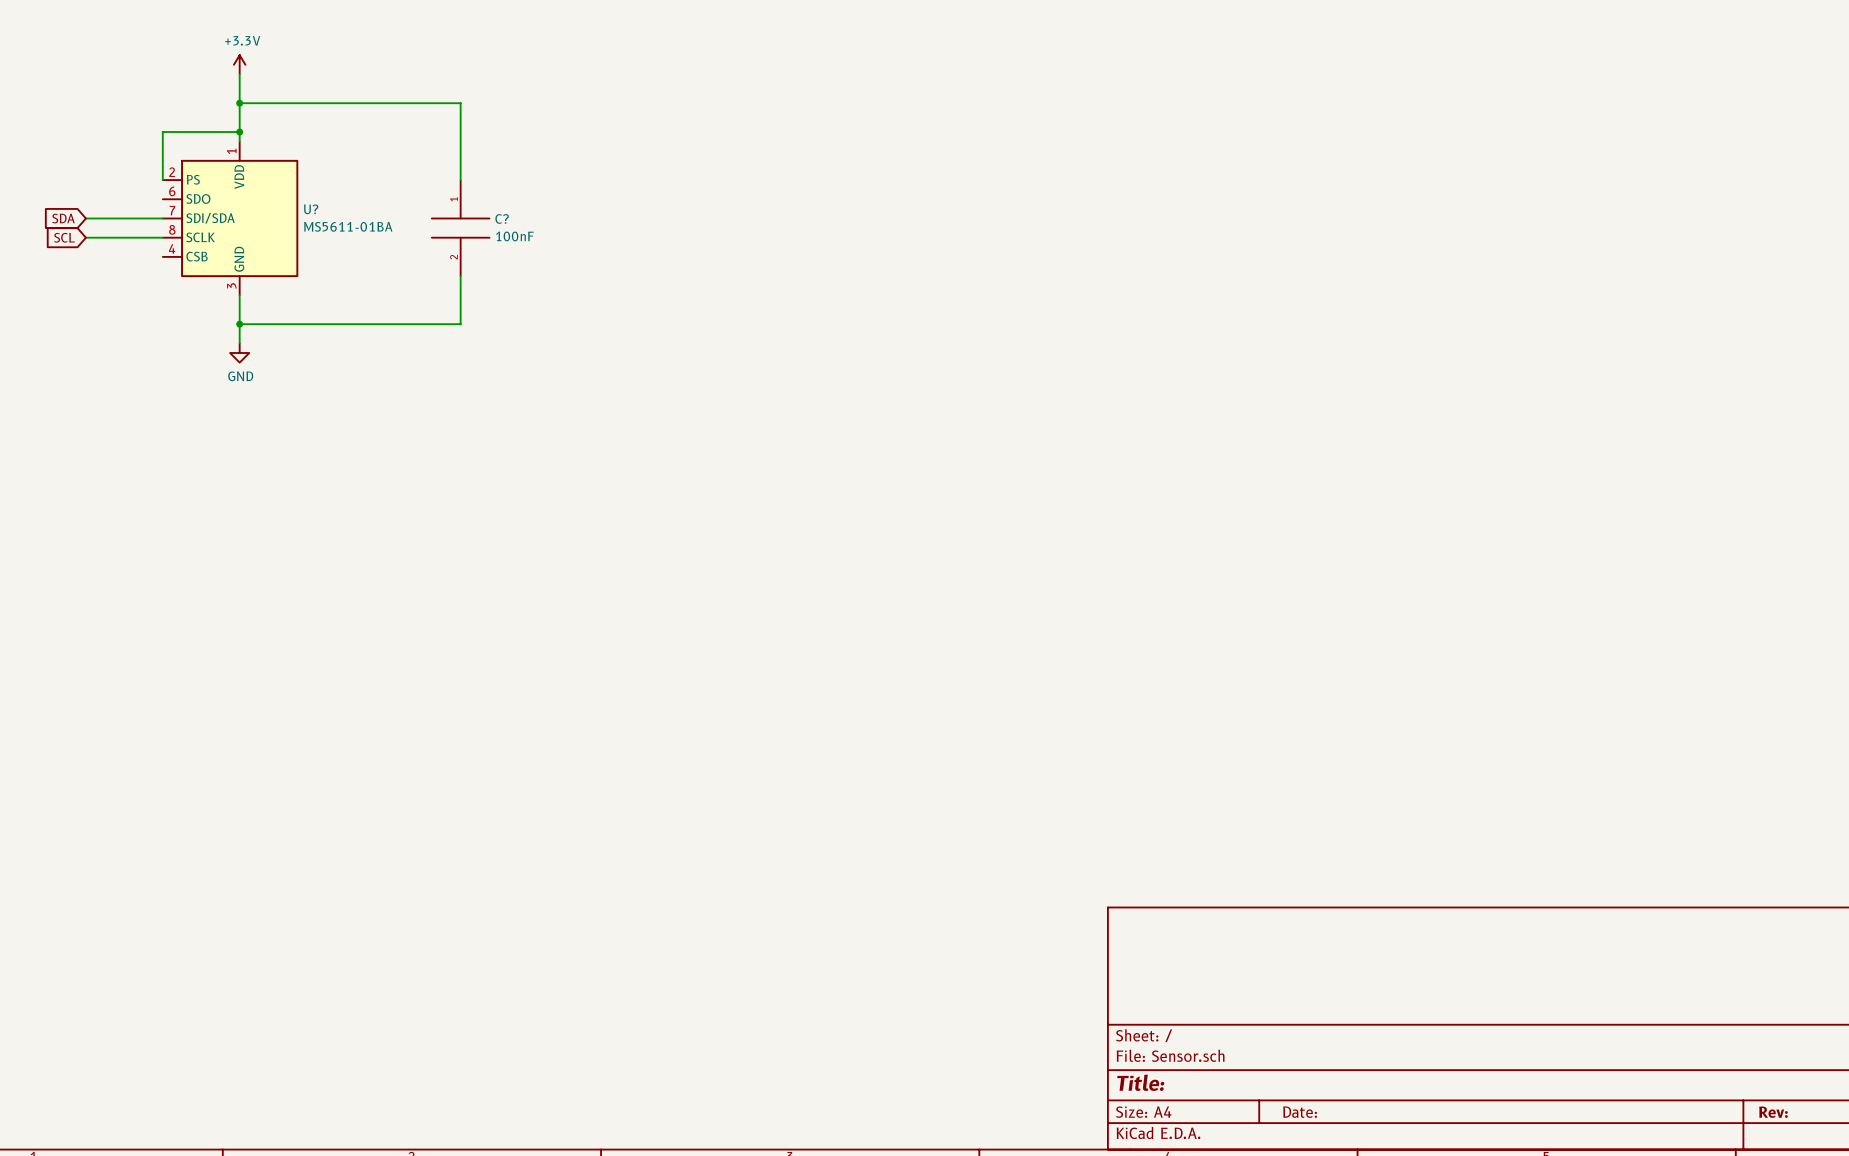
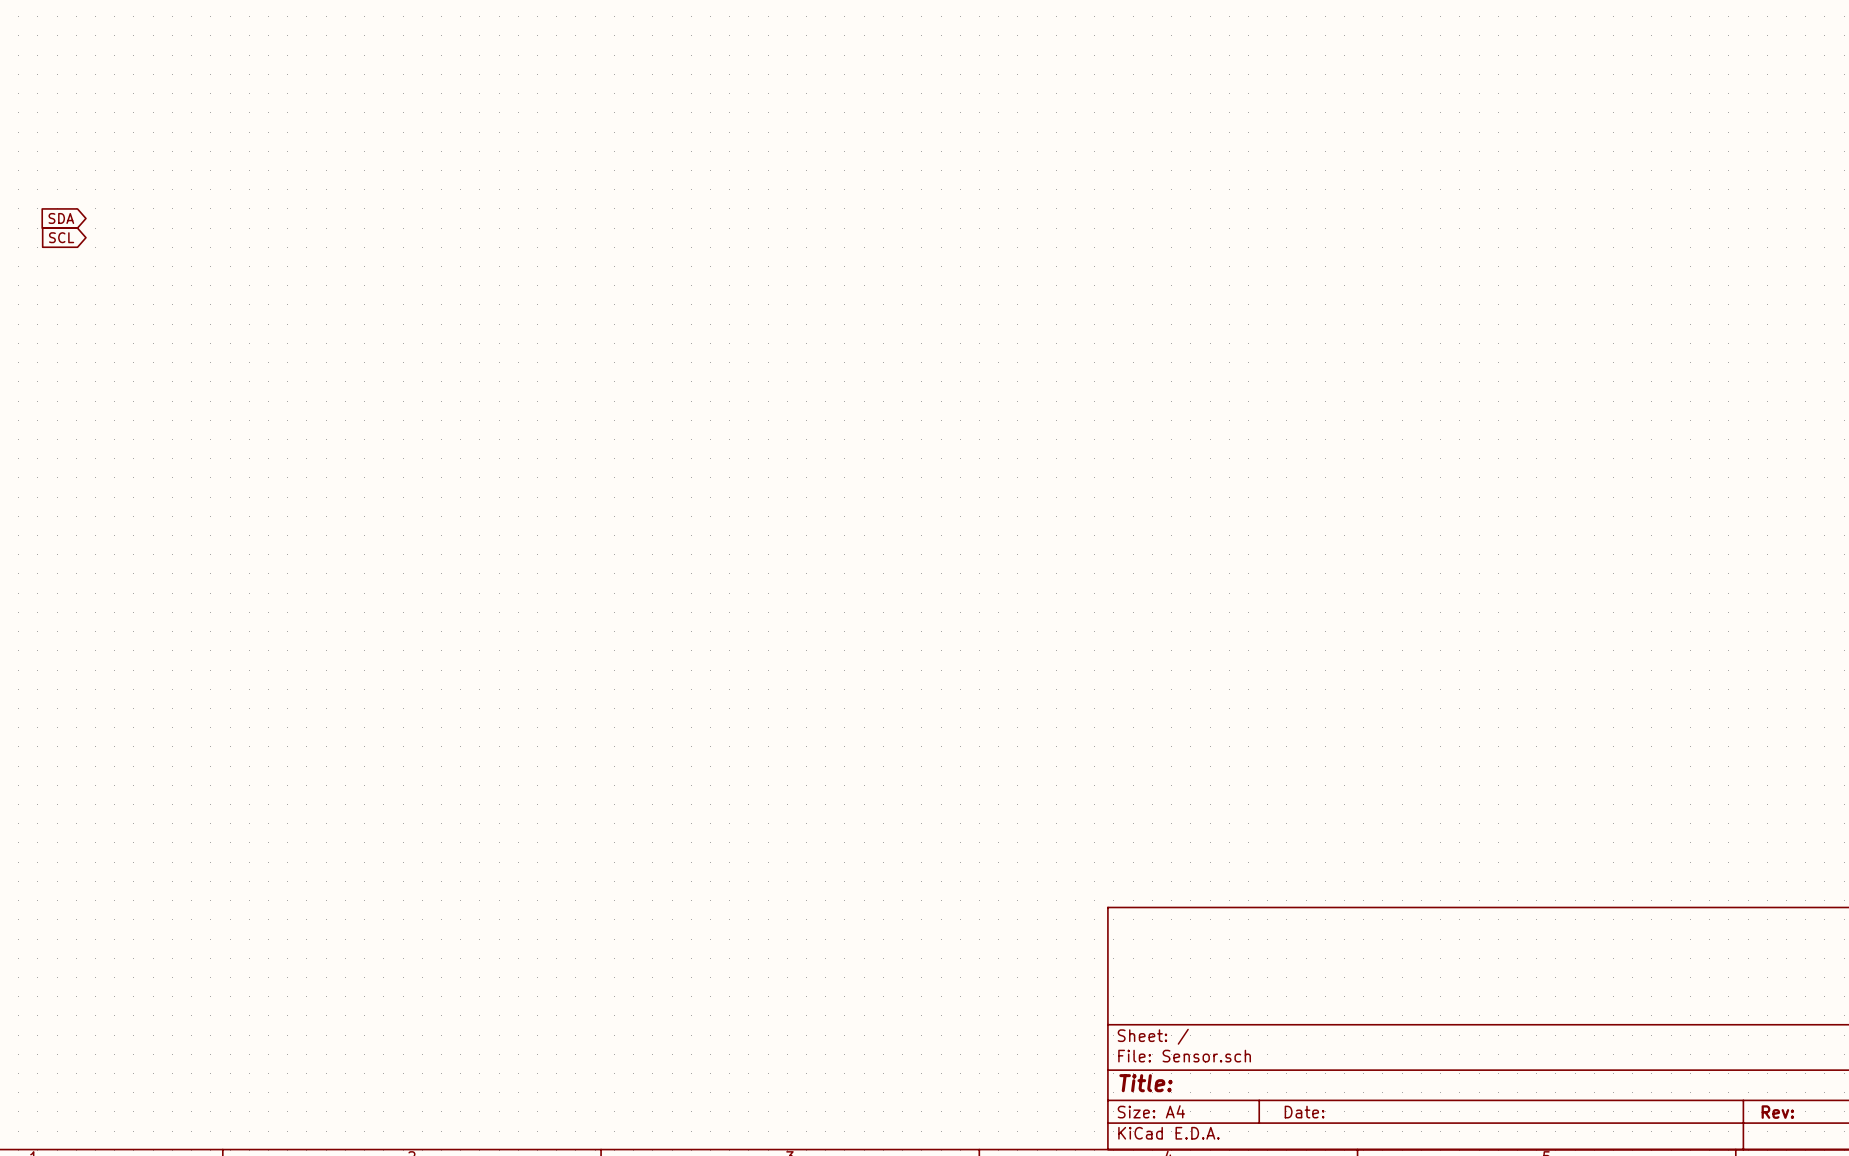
power symbol: +3.3V (239, 64) -> none
wire: (239, 74) (239, 141) -> none
wire: (239, 103) (460, 103) (460, 180) -> none
junction: (239, 103) -> none
wire: (239, 132) (162, 132) (162, 180) -> none
junction: (239, 132) -> none
wire: (85, 218) (162, 218) -> none
U?: MS5611-01BA (230, 218) -> none
C?: 100nF (460, 228) -> none
wire: (85, 237) (162, 237) -> none
wire: (460, 276) (460, 324) (239, 324) -> none
wire: (239, 295) (239, 343) -> none
junction: (239, 324) -> none
power symbol: GND (239, 352) -> none

